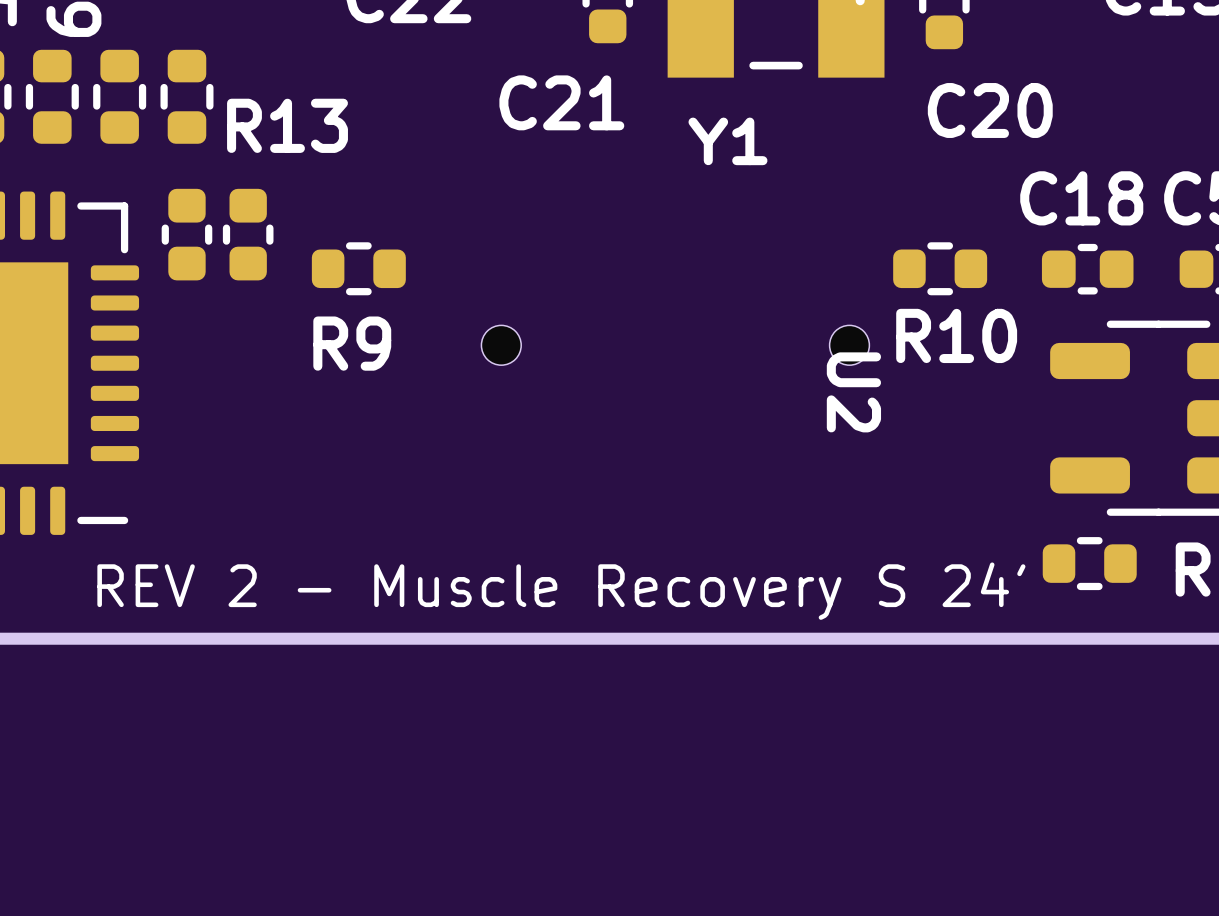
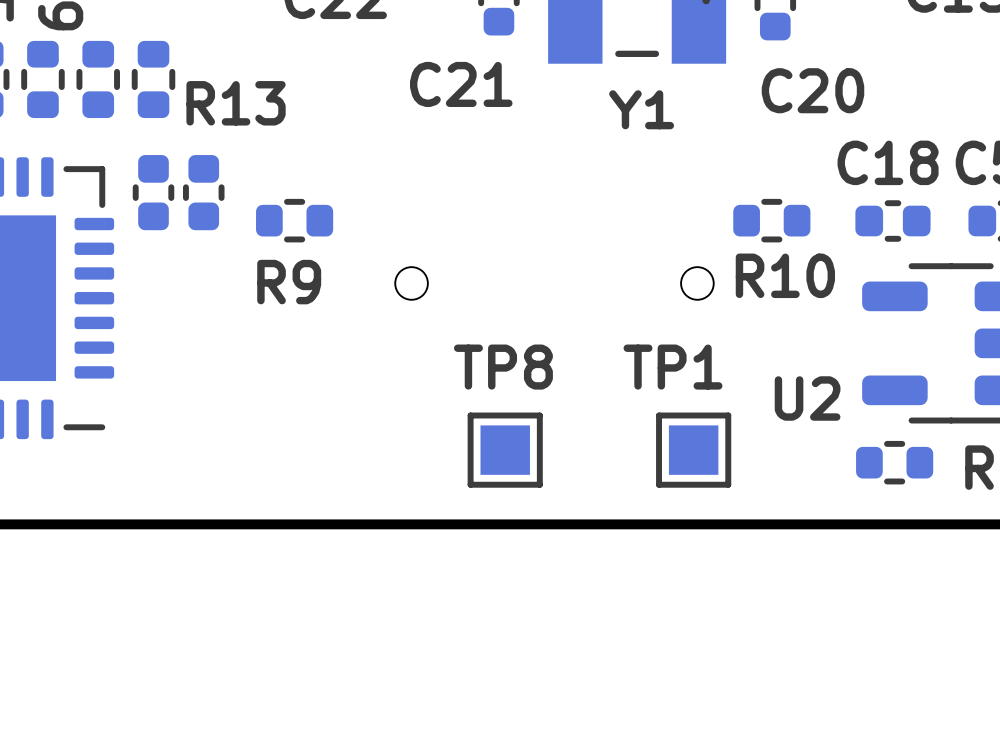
Y1 name position: Y1 (727, 141) -> Y1 (641, 109)
U2 name rotation: 0° (853, 392) -> 90° counterclockwise (807, 398)
U2 name position: U2 (853, 392) -> U2 (807, 398)
TP8: none -> (505, 450)
TP1: none -> (693, 450)
text: REV 2 - Muscle Recovery S 24' (561, 591) -> none

